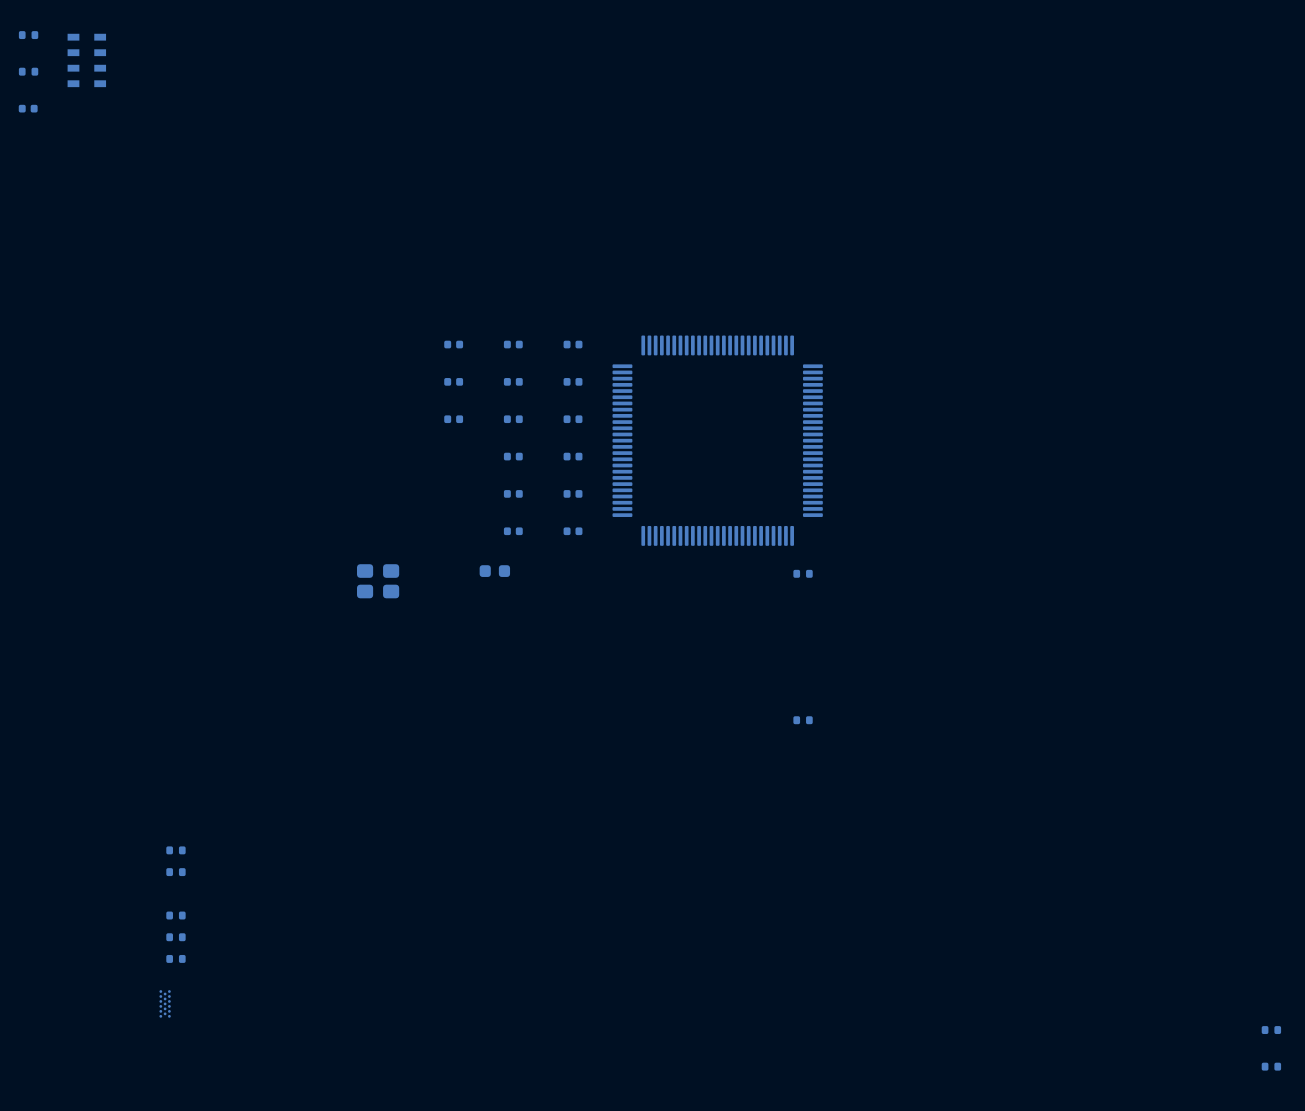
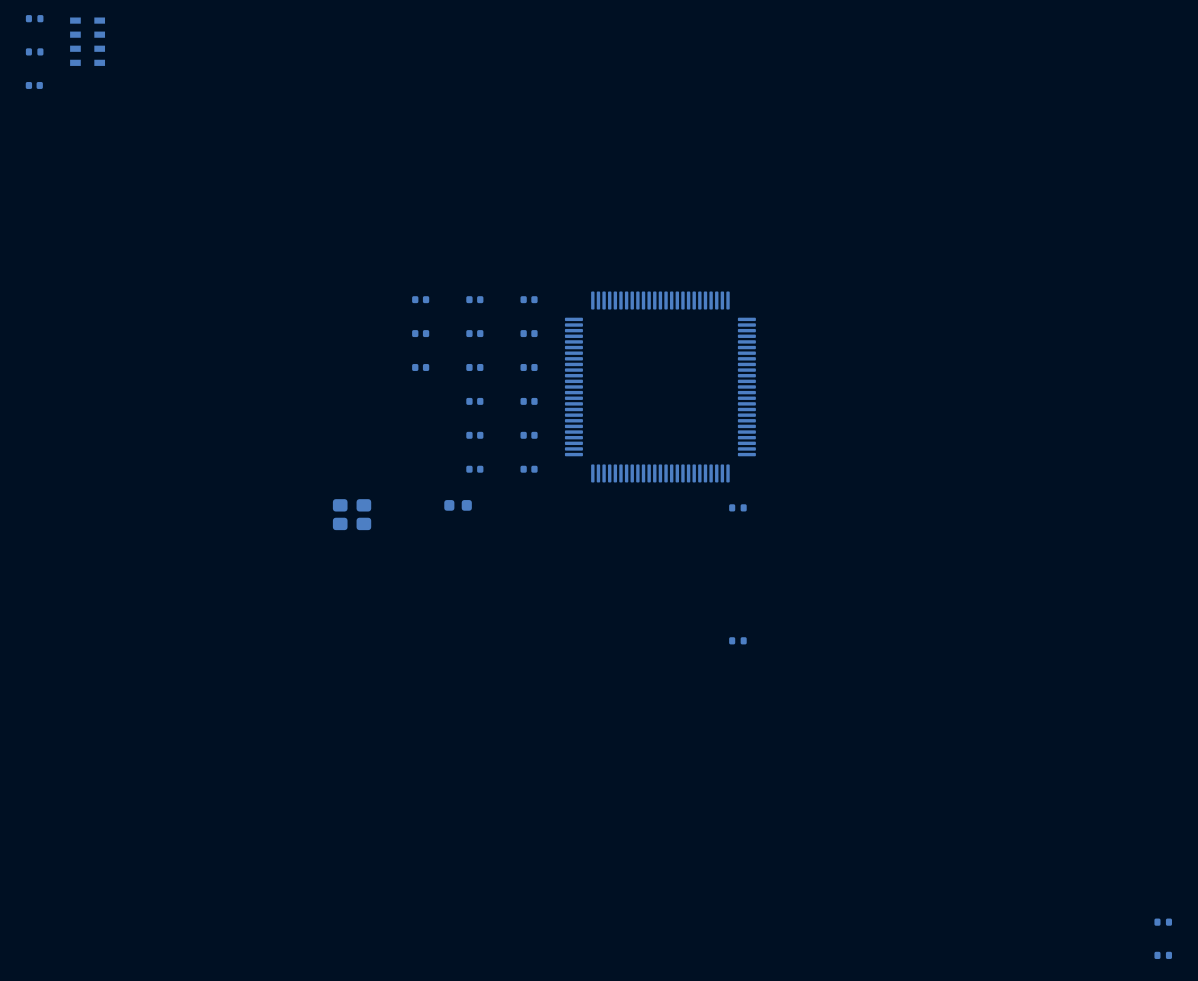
part: (175, 850) -> none
part: (175, 872) -> none
part: (175, 915) -> none
part: (175, 937) -> none
part: (175, 958) -> none
part: (165, 1003) -> none

